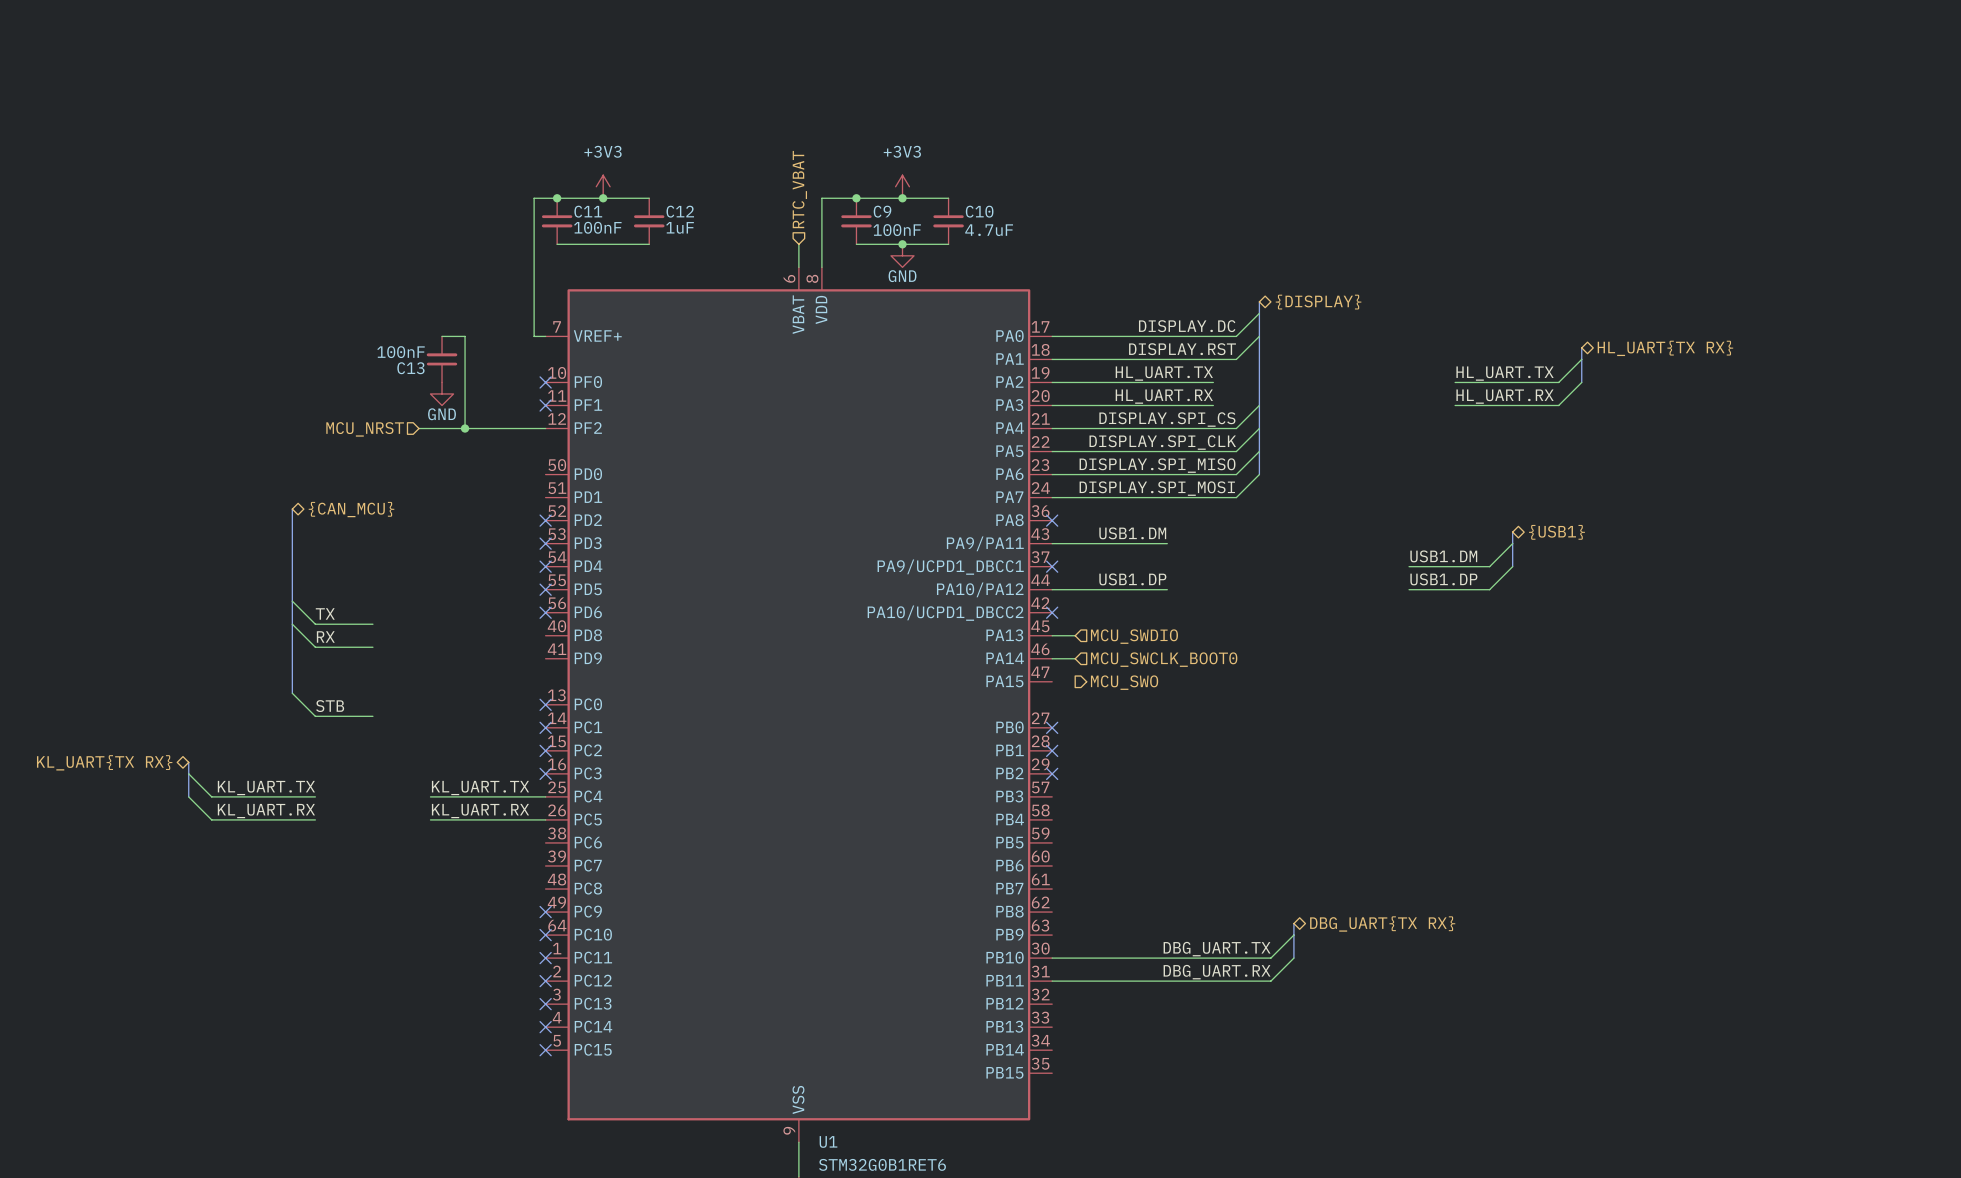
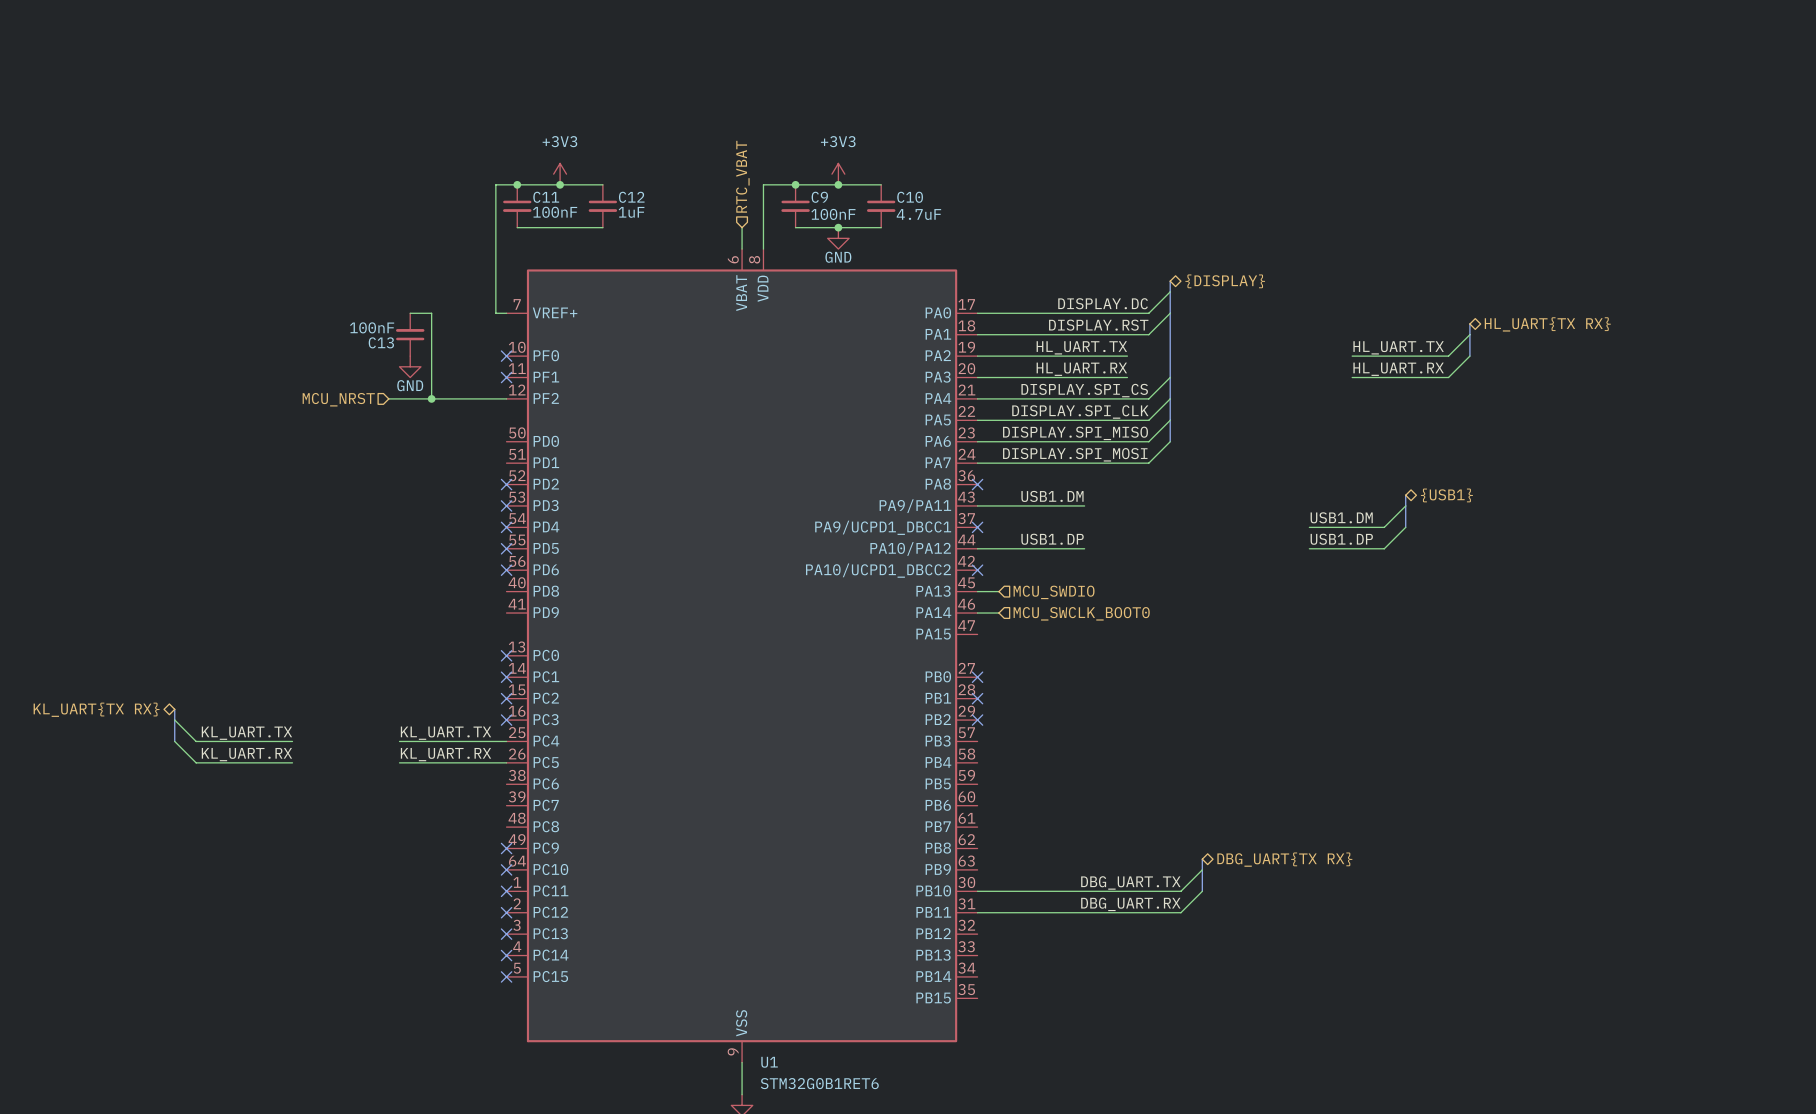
bus: (292, 509) (292, 693) -> none
hierarchical label: {CAN_MCU} (351, 509) -> none
wire: (292, 601) (315, 624) (372, 624) -> none
label: TX (325, 613) -> none
wire: (292, 624) (315, 647) (372, 647) -> none
label: RX (325, 636) -> none
hierarchical label: MCU_SWO (1124, 682) -> none
wire: (292, 693) (315, 716) (372, 716) -> none
label: STB (330, 706) -> none

